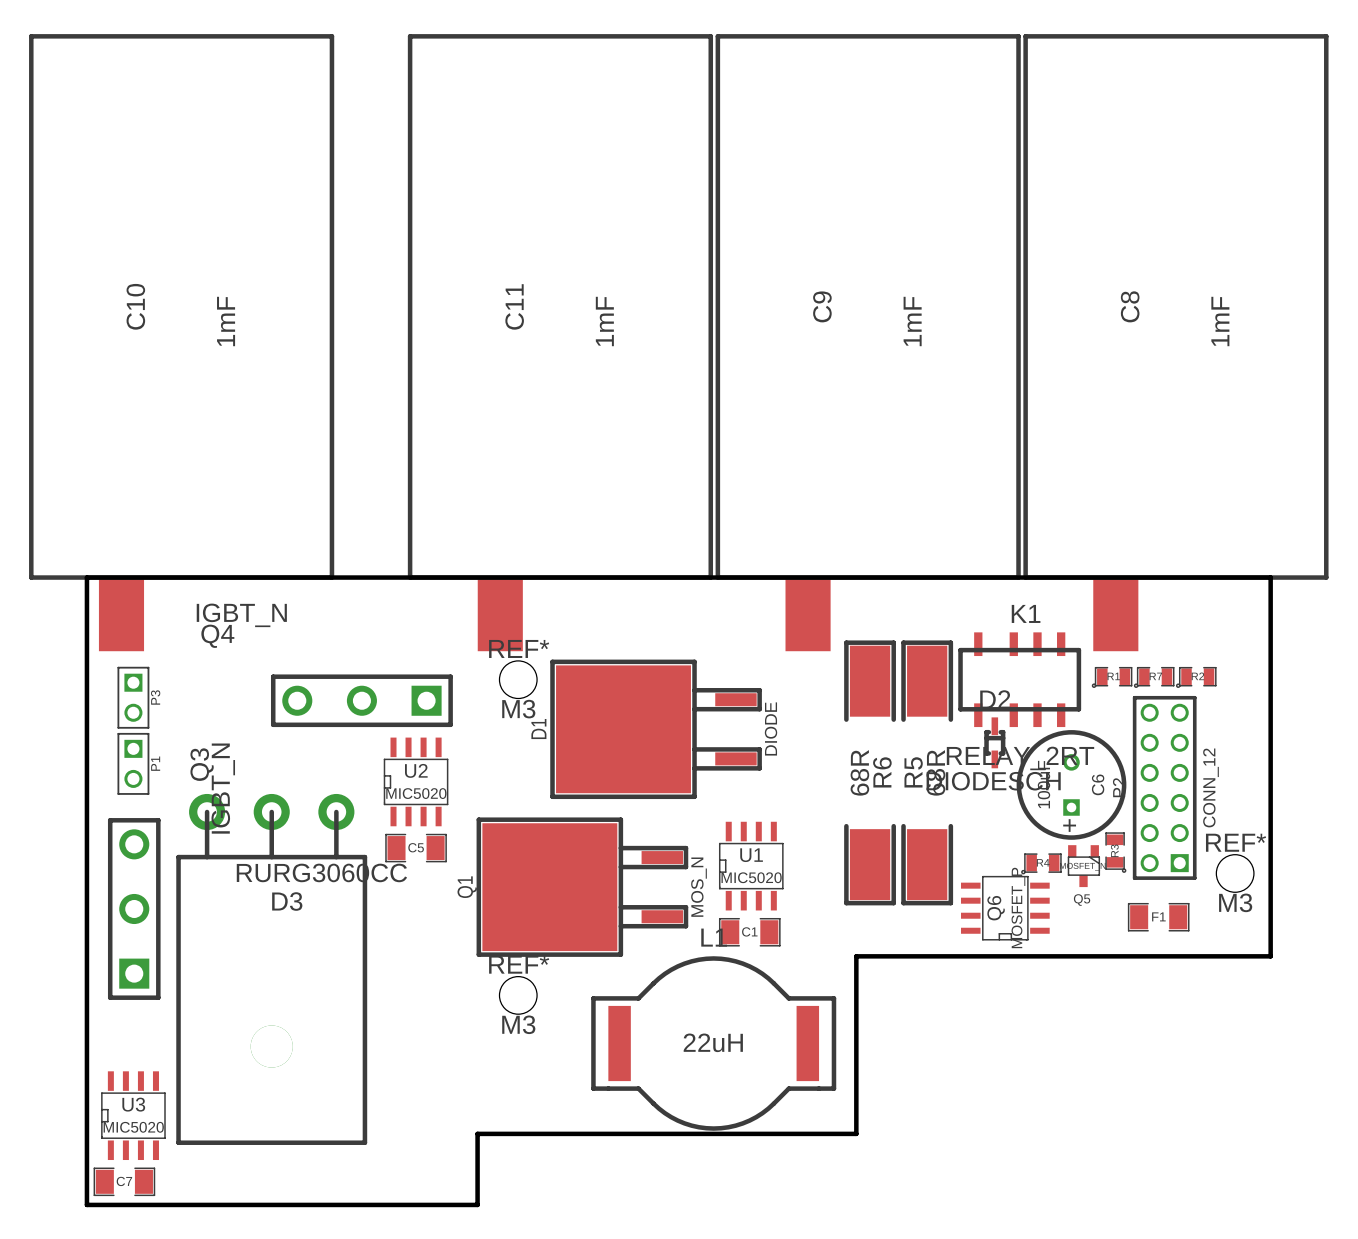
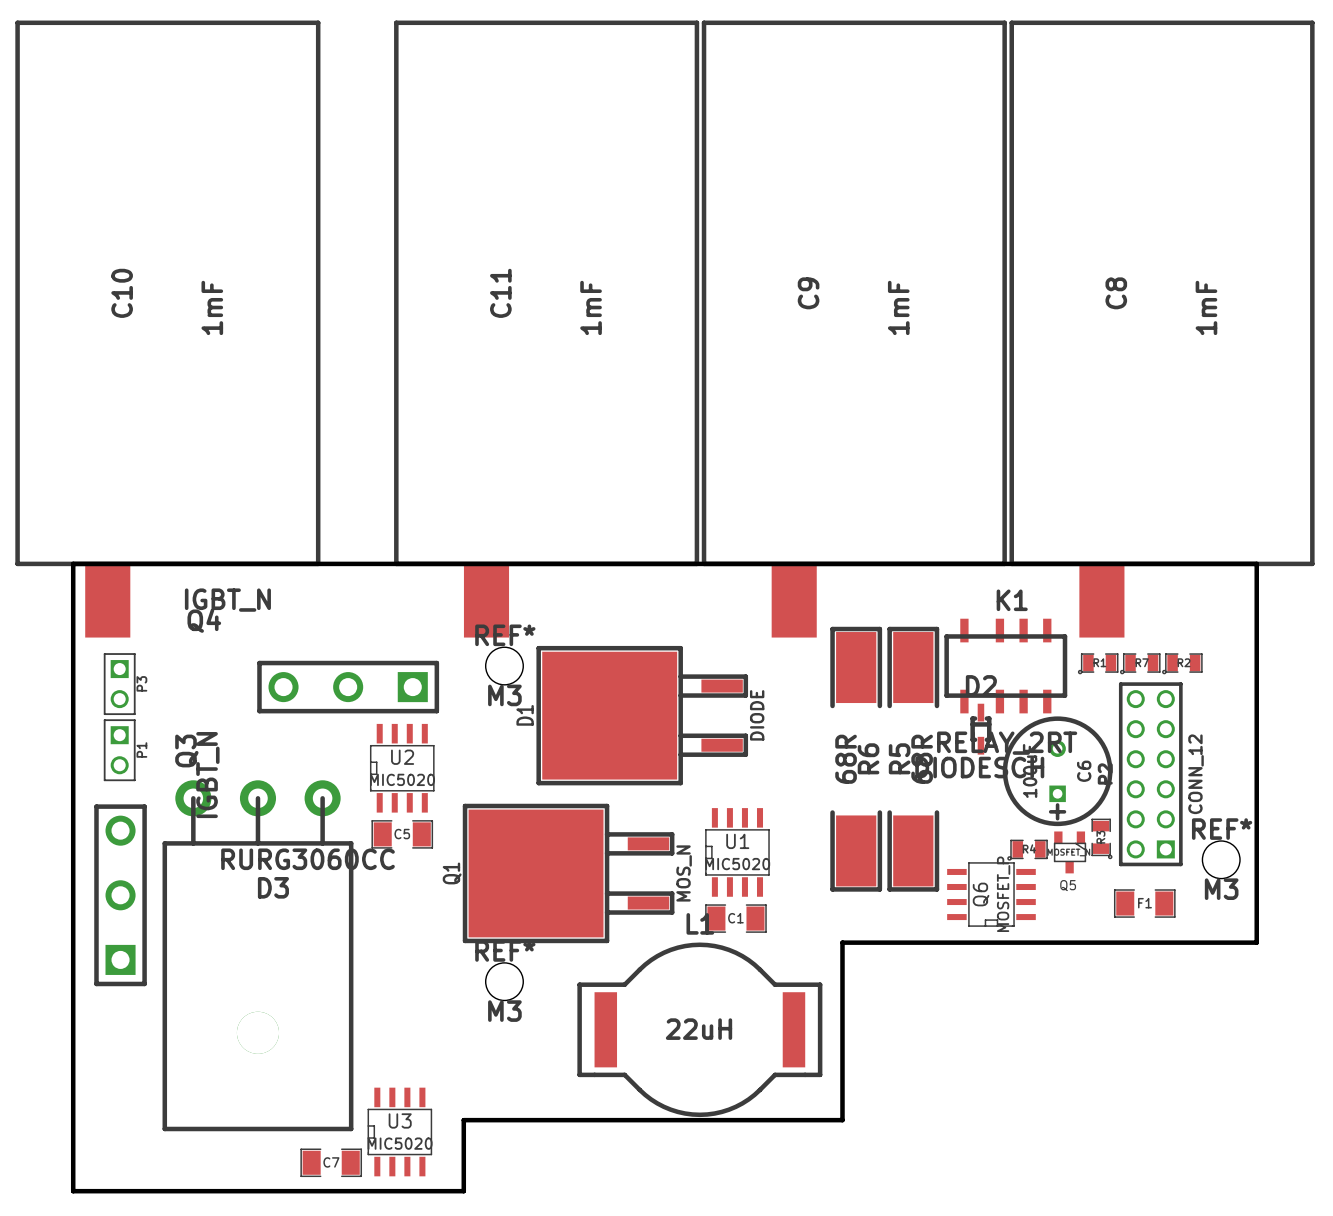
U3 position: (133, 1115) -> (399, 1131)
C7 position: (124, 1181) -> (331, 1162)

